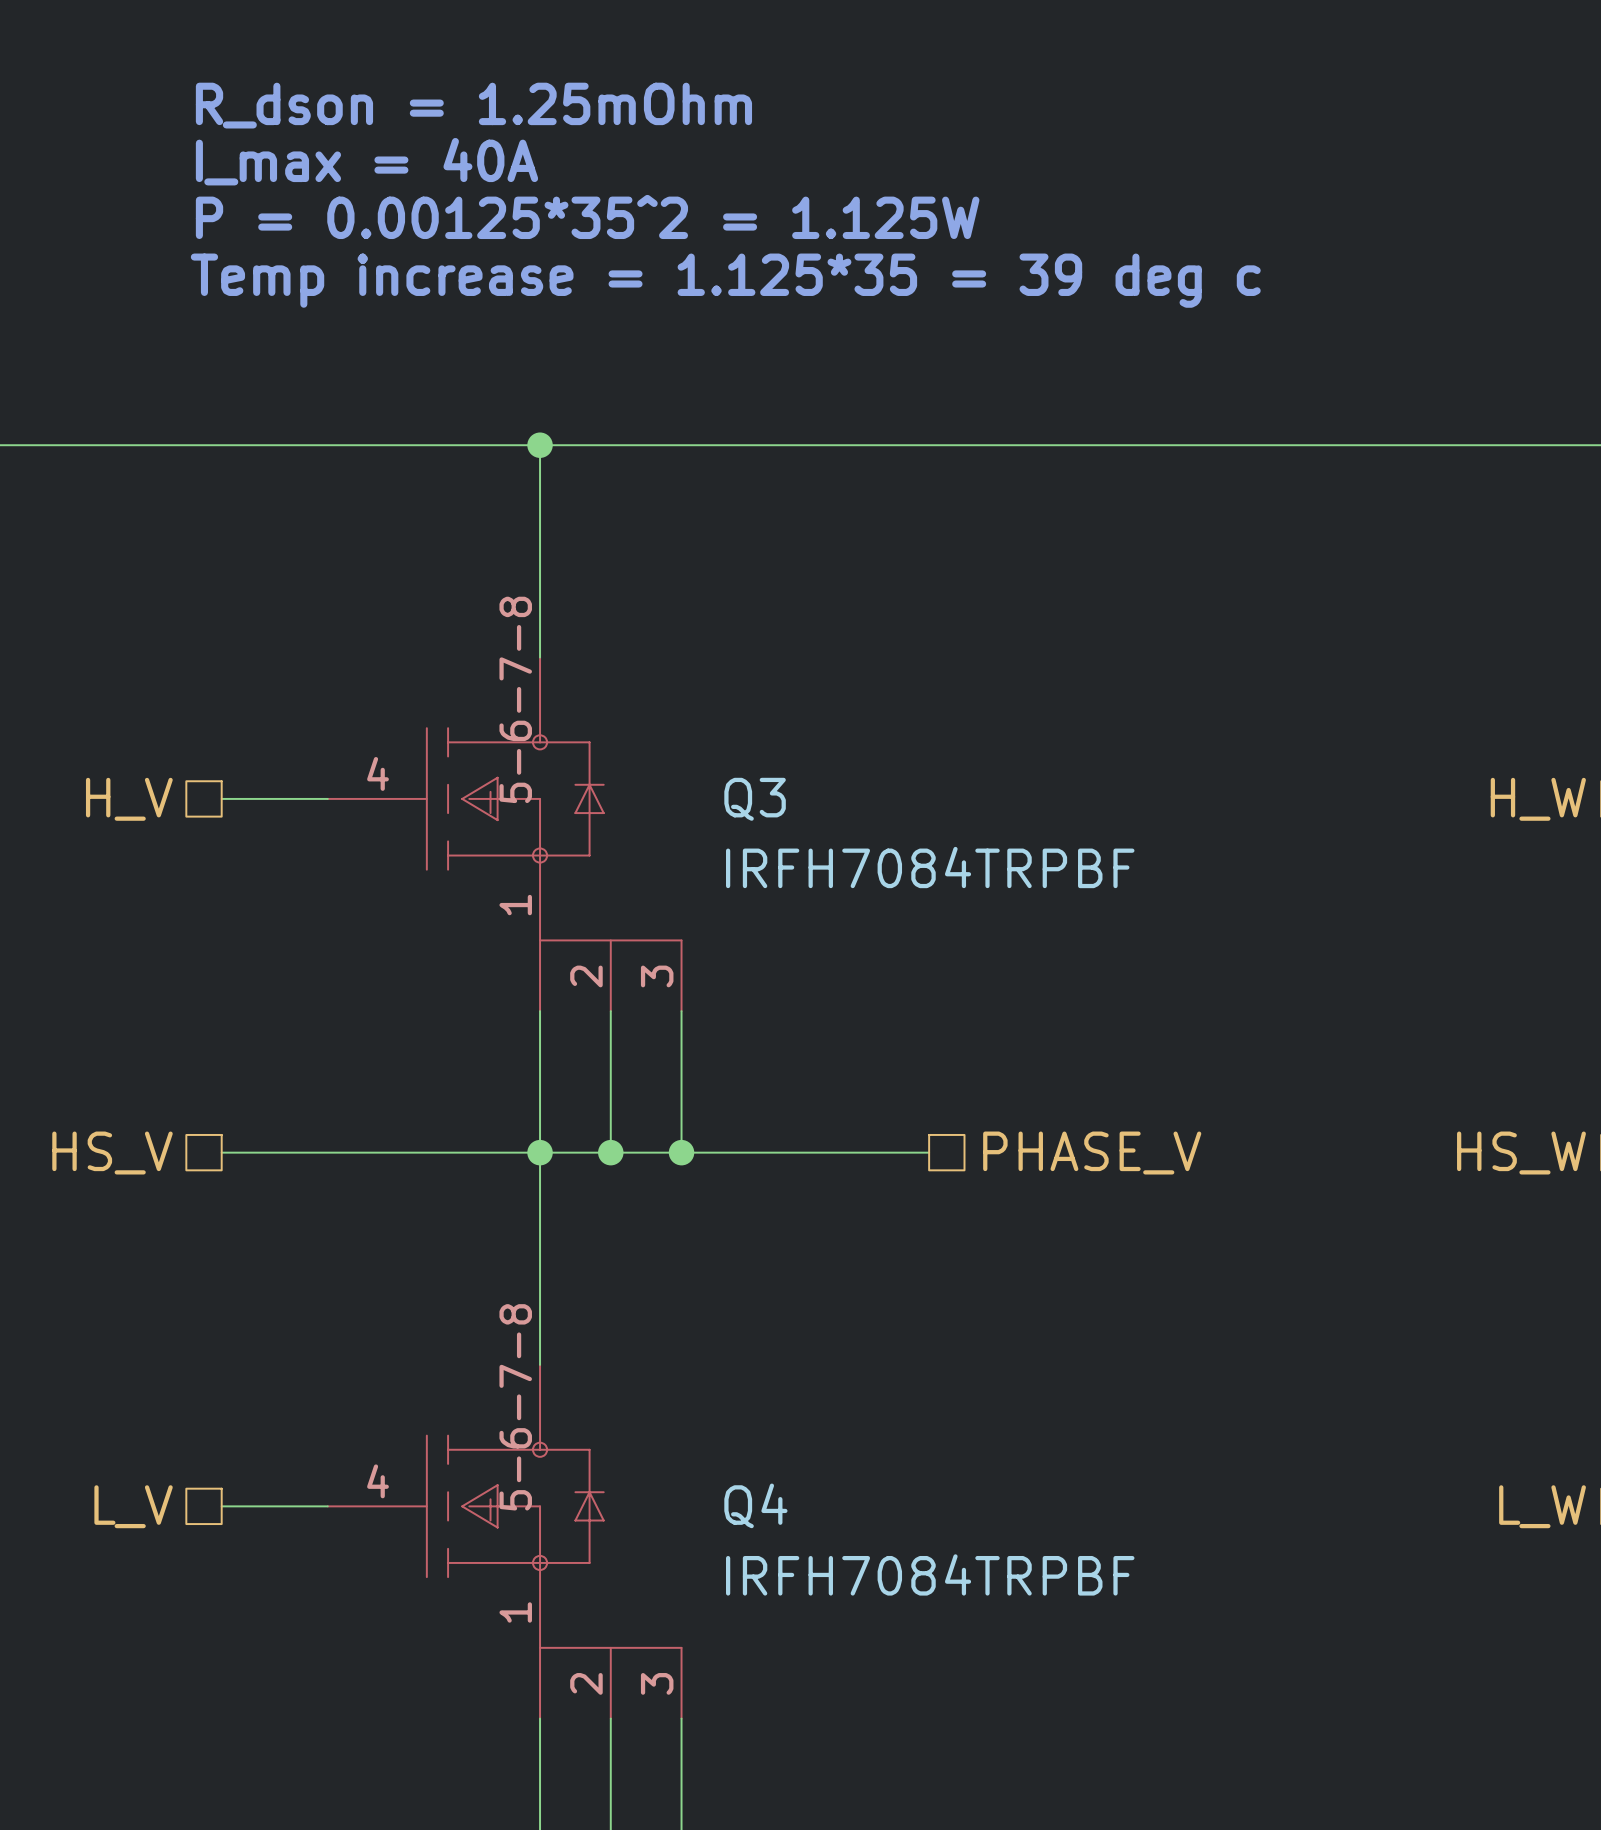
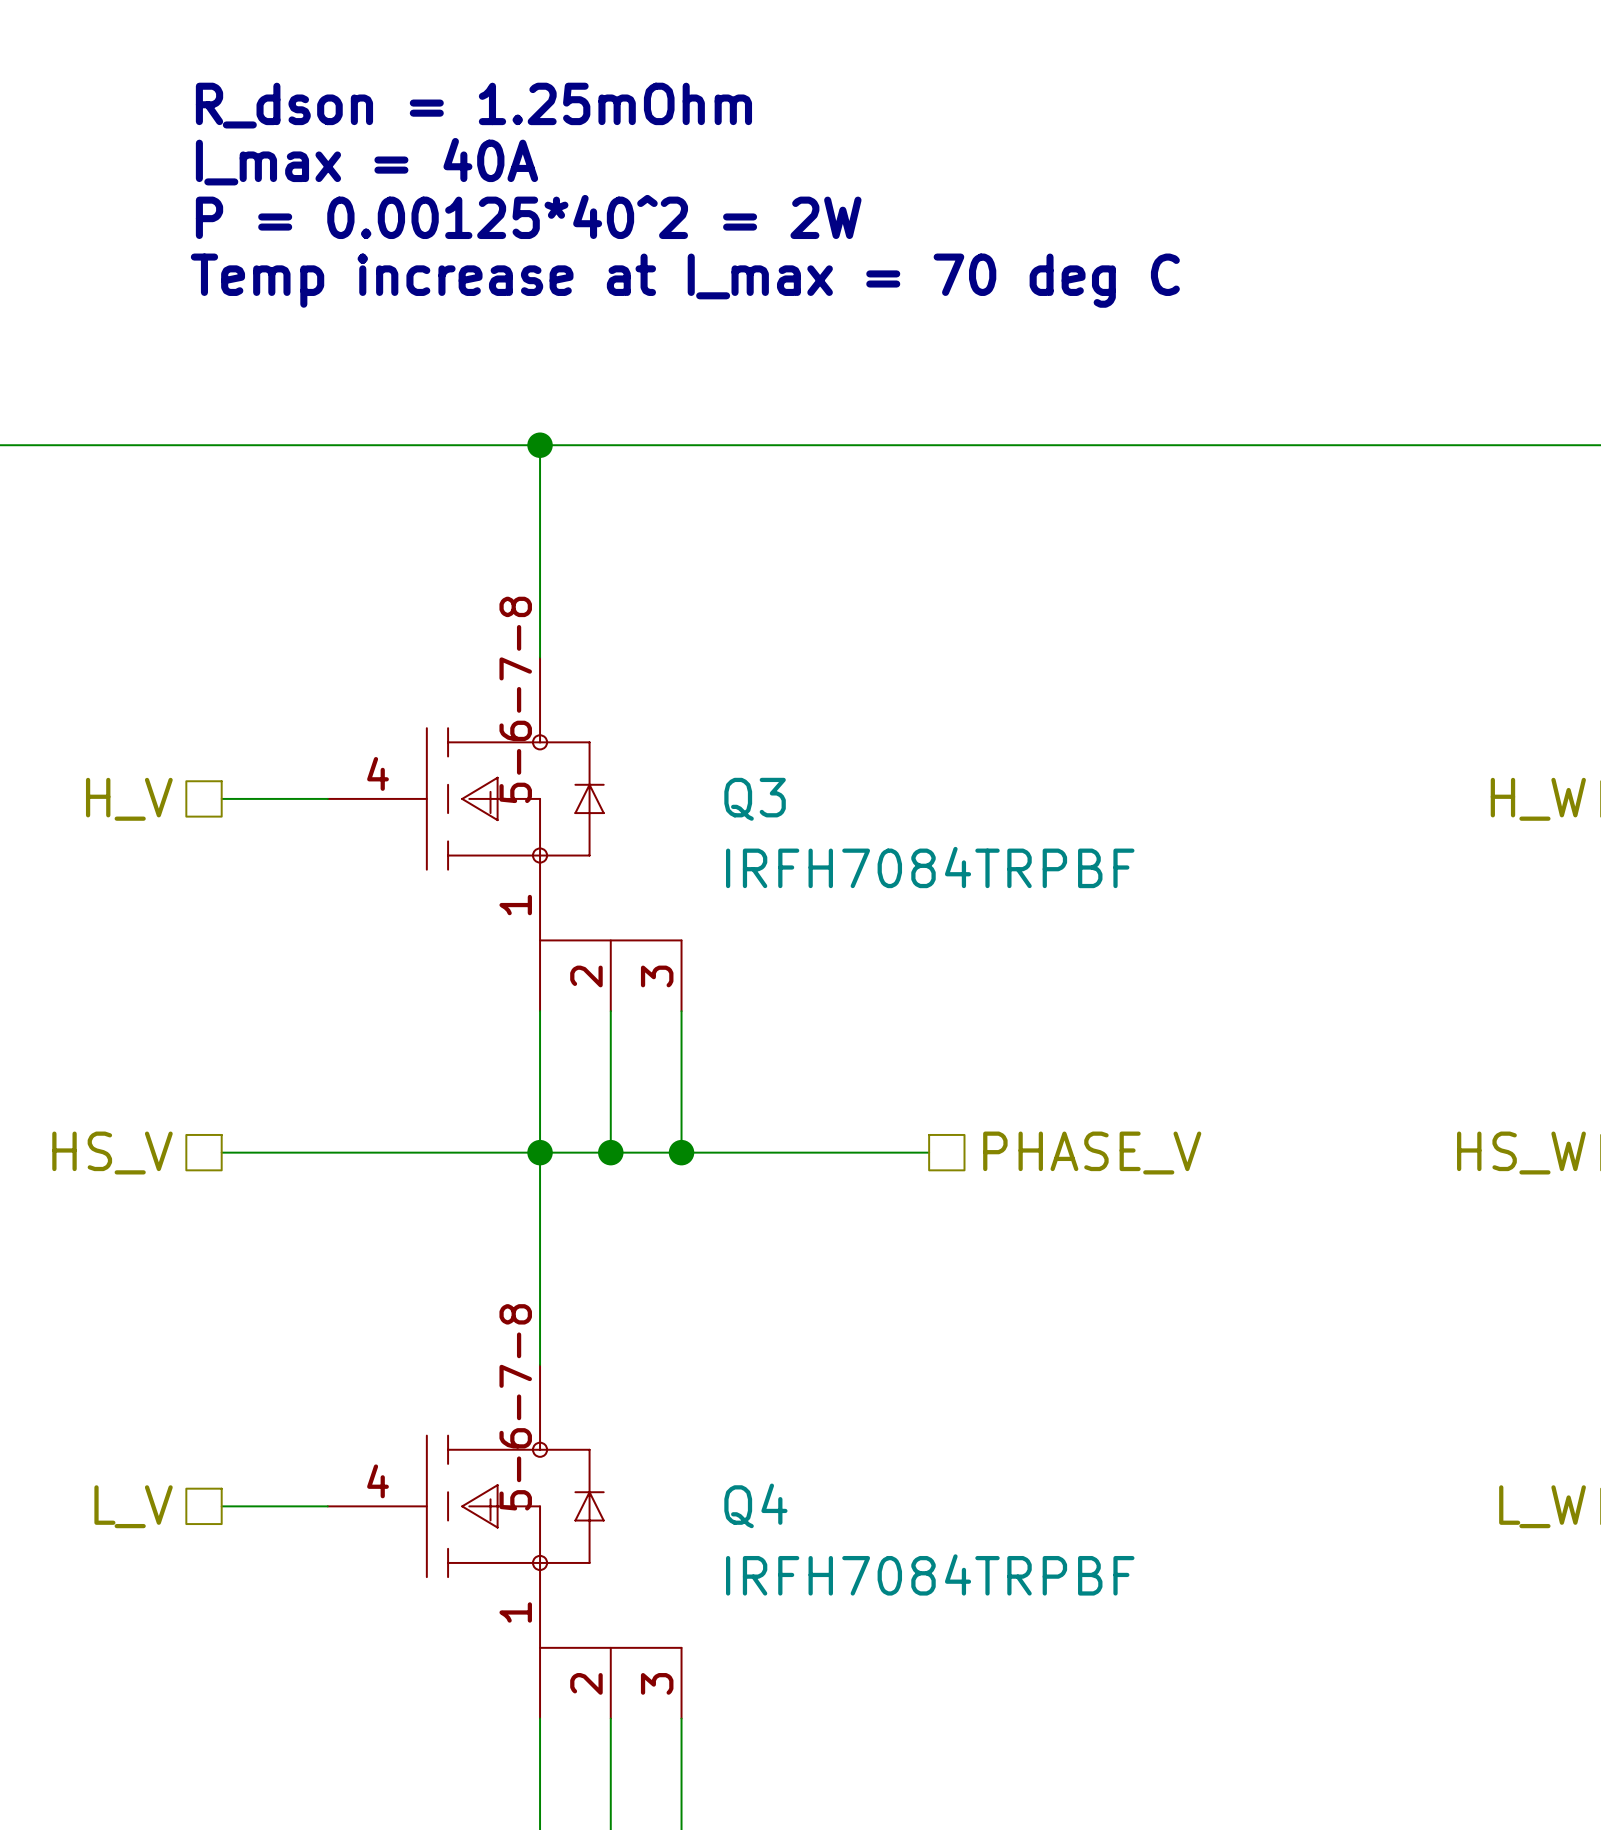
text: P = 0.00125*35^2 = 1.125W (587, 216) -> P = 0.00125*40^2 = 2W (528, 216)
text: Temp increase = 1.125*35 = 39 deg c (725, 280) -> Temp increase at I_max = 70 deg C (685, 280)

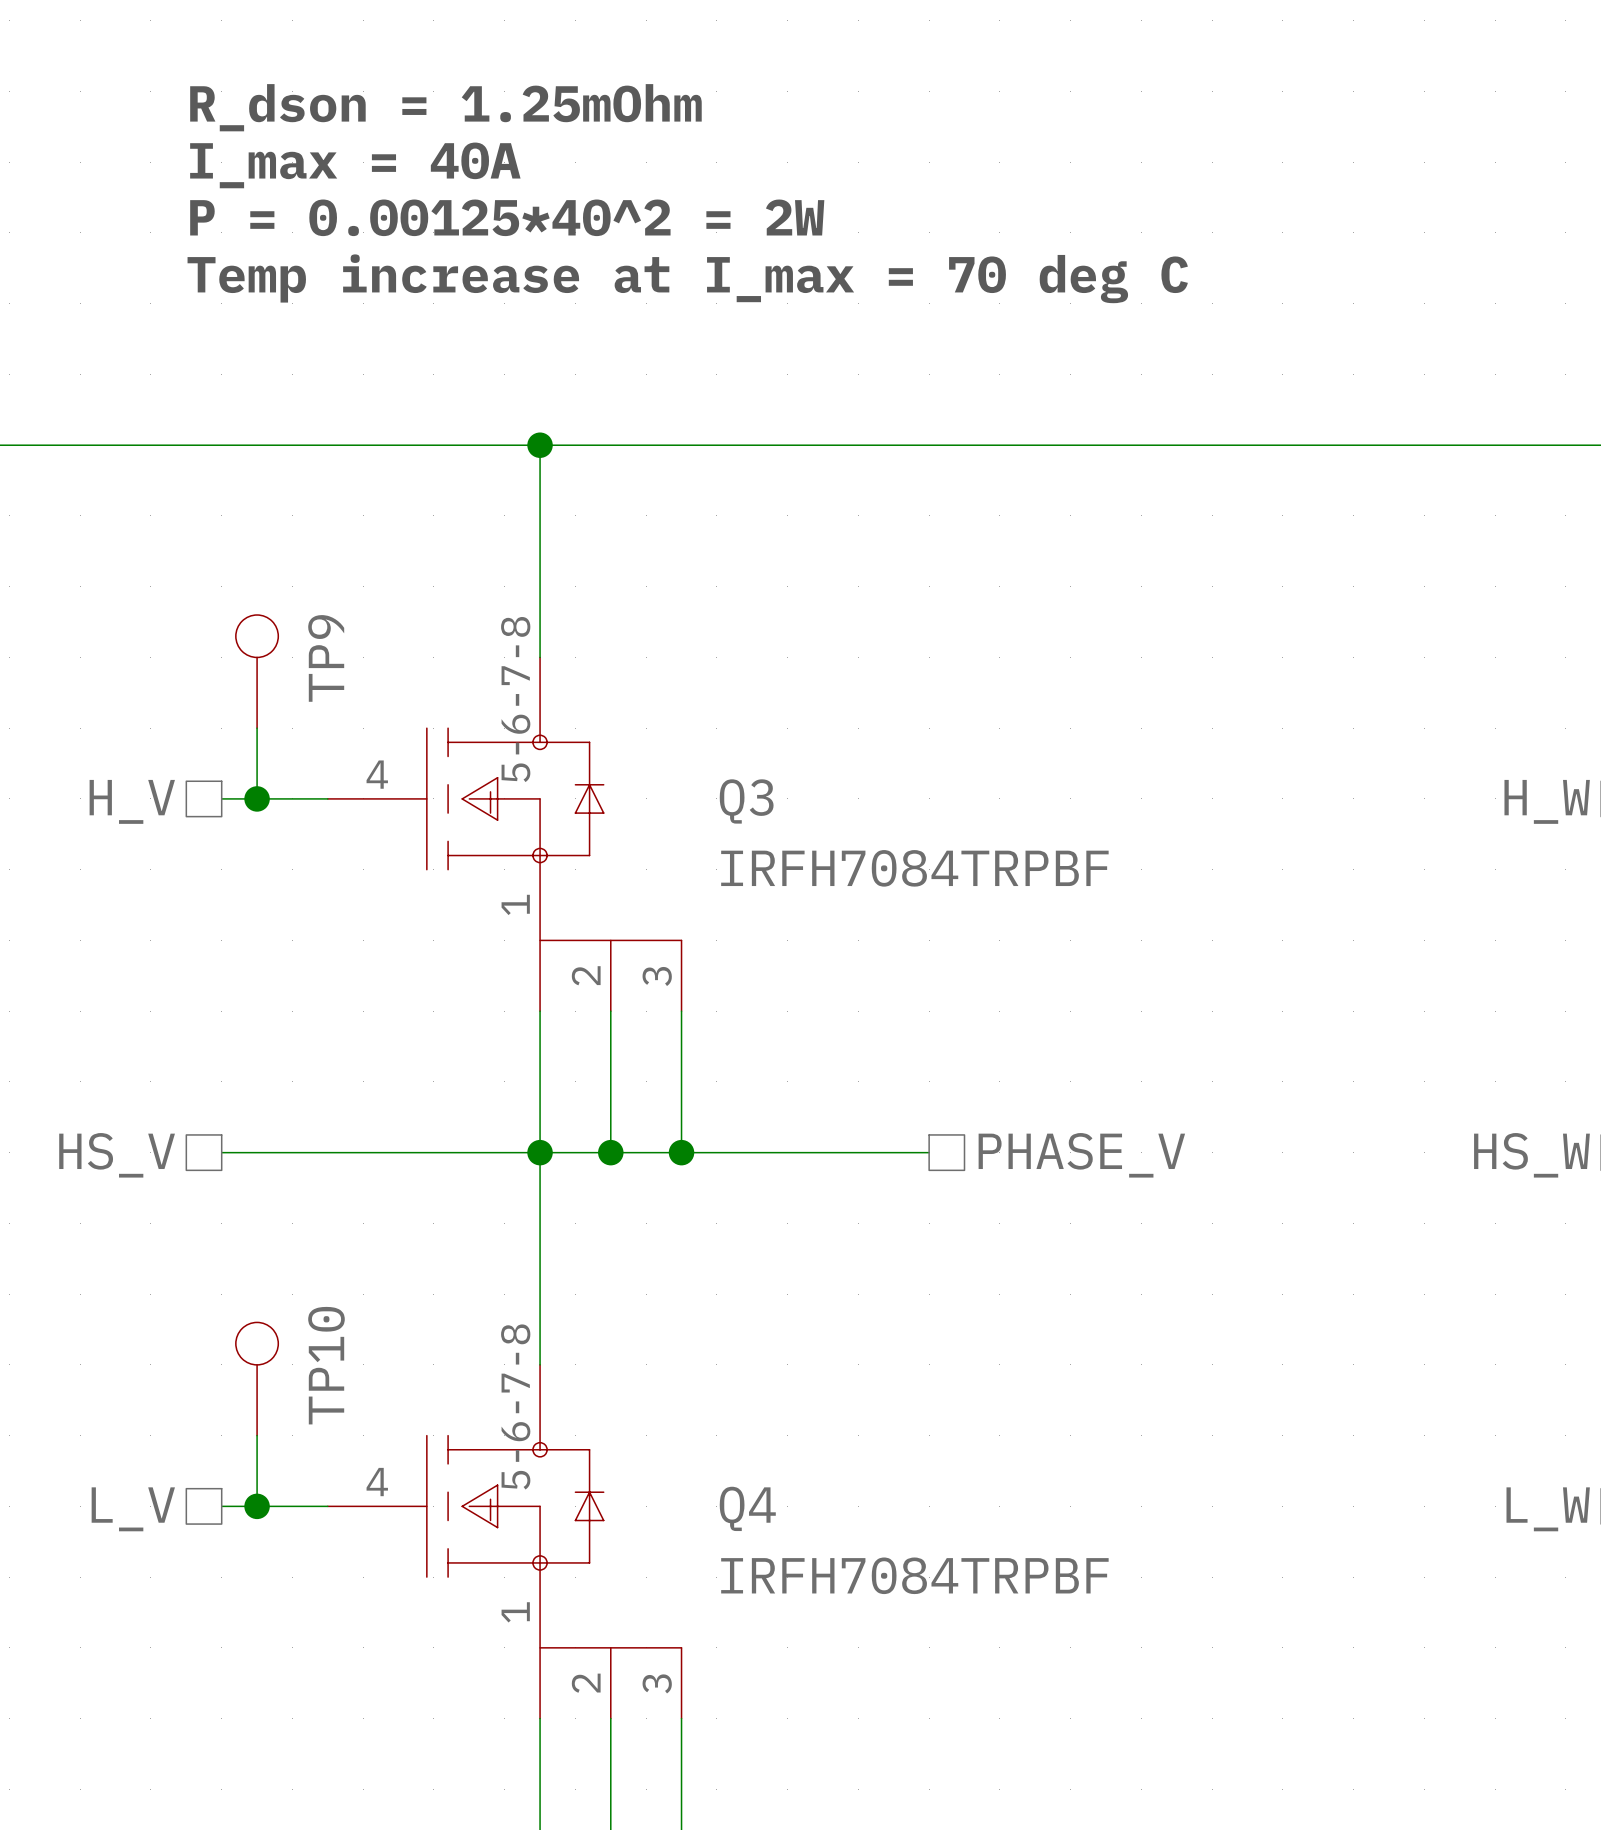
TP9: none -> (257, 671)
wire: none -> (257, 728) (257, 798)
junction: none -> (257, 798)
TP10: none -> (257, 1379)
wire: none -> (257, 1435) (257, 1506)
junction: none -> (257, 1506)

